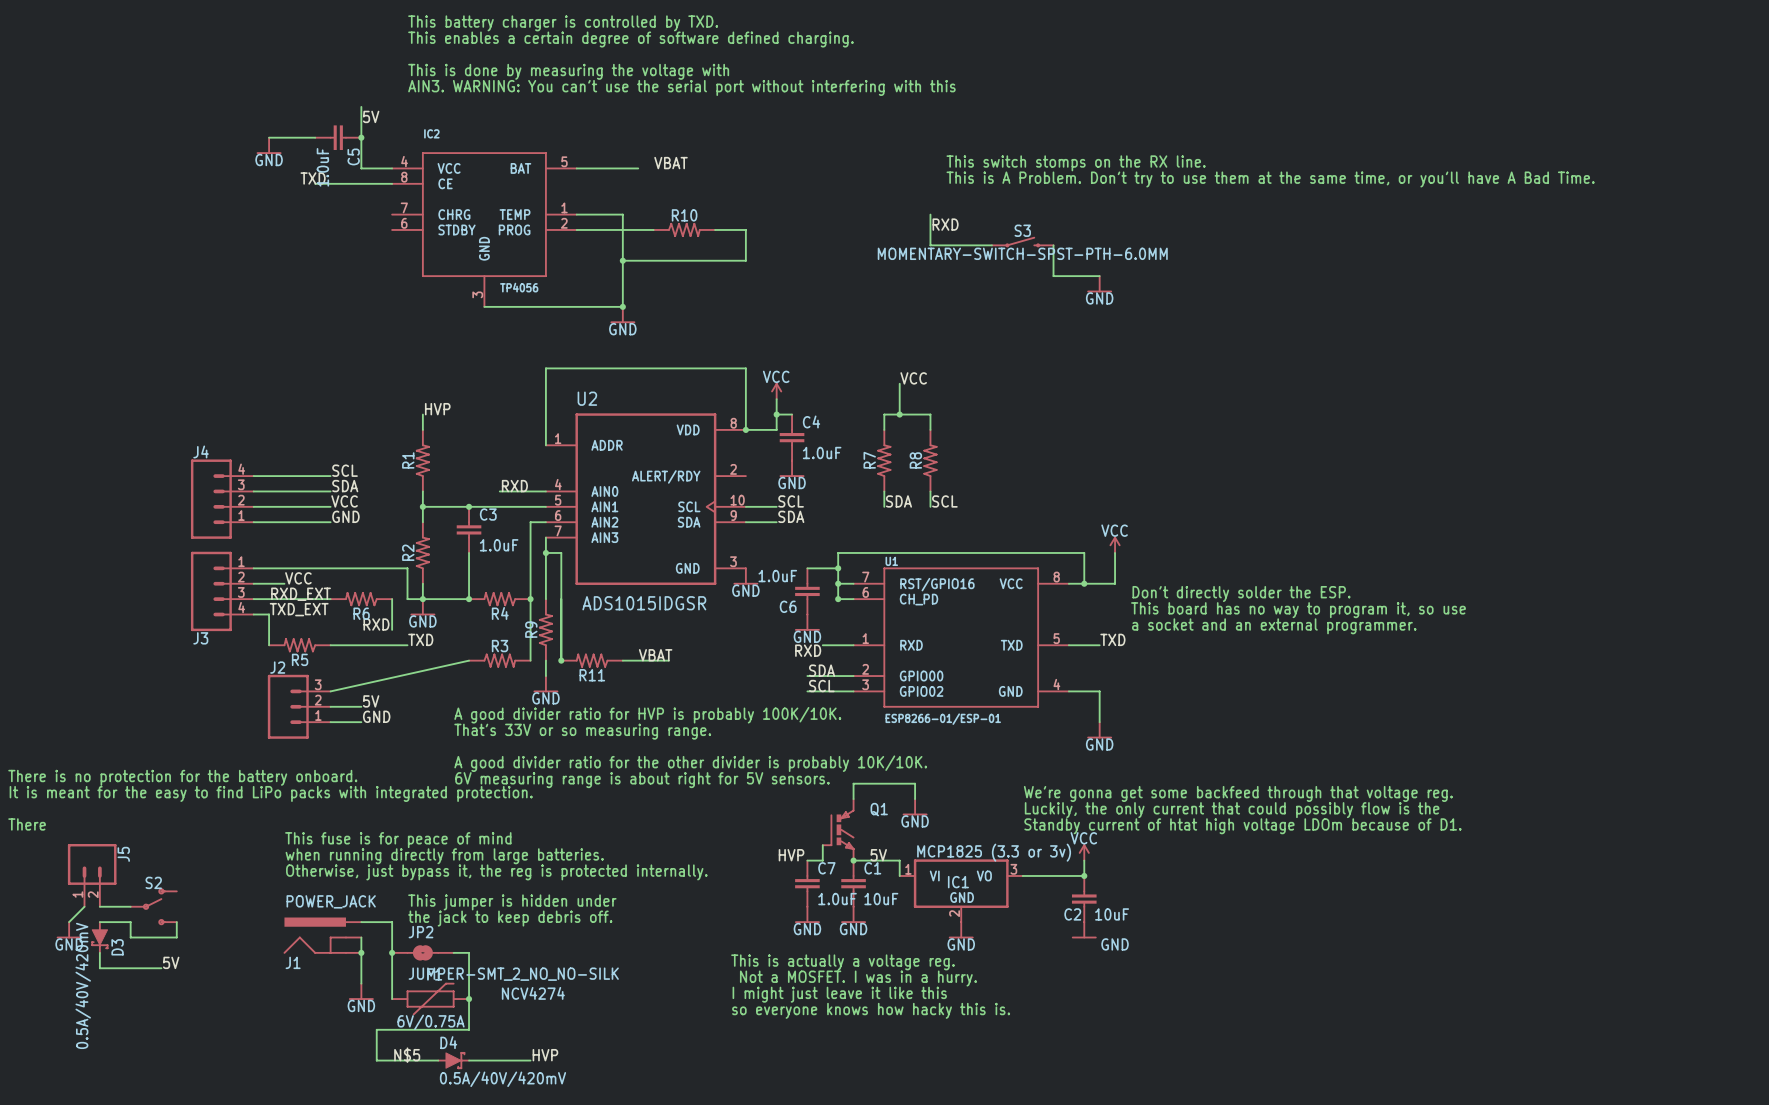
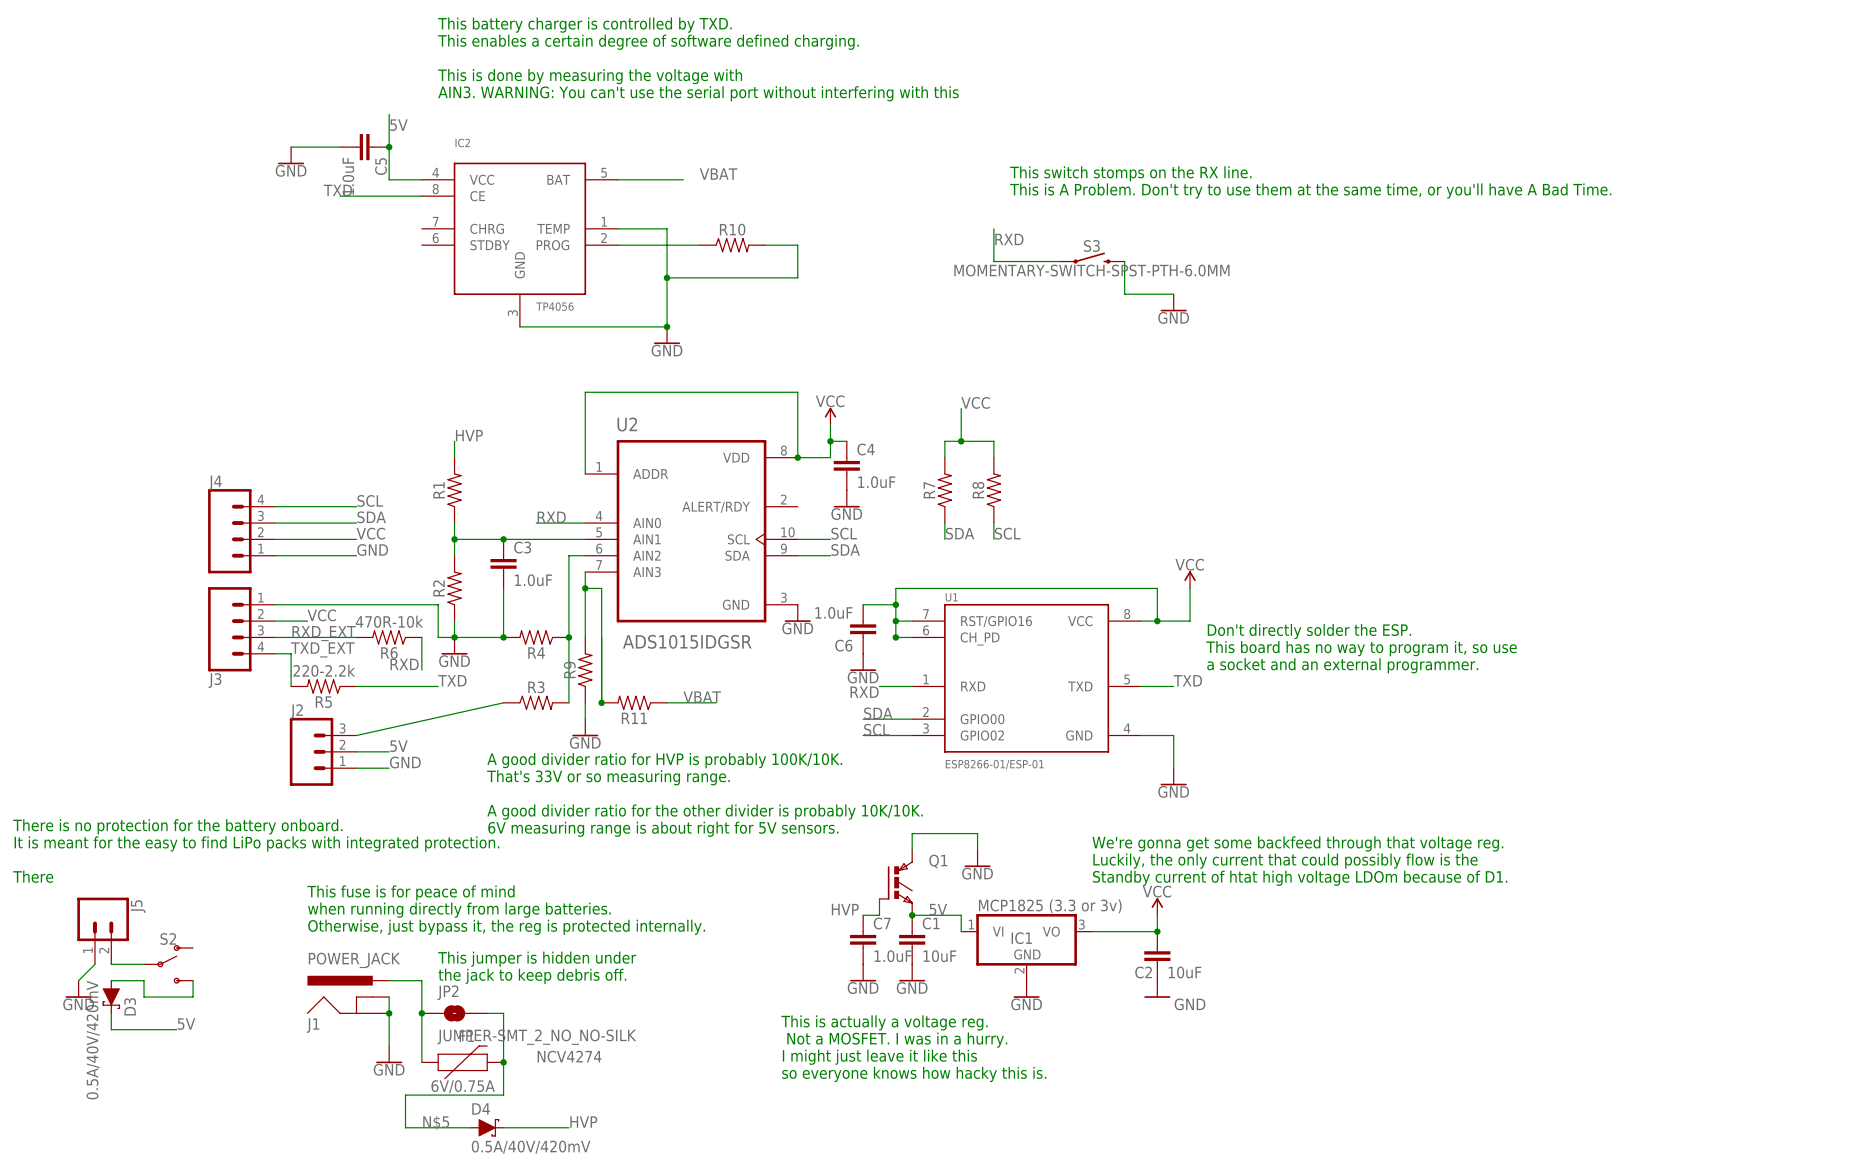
R6 value: none -> 470R-10k (389, 621)
R5 value: none -> 220-2.2k (324, 670)

